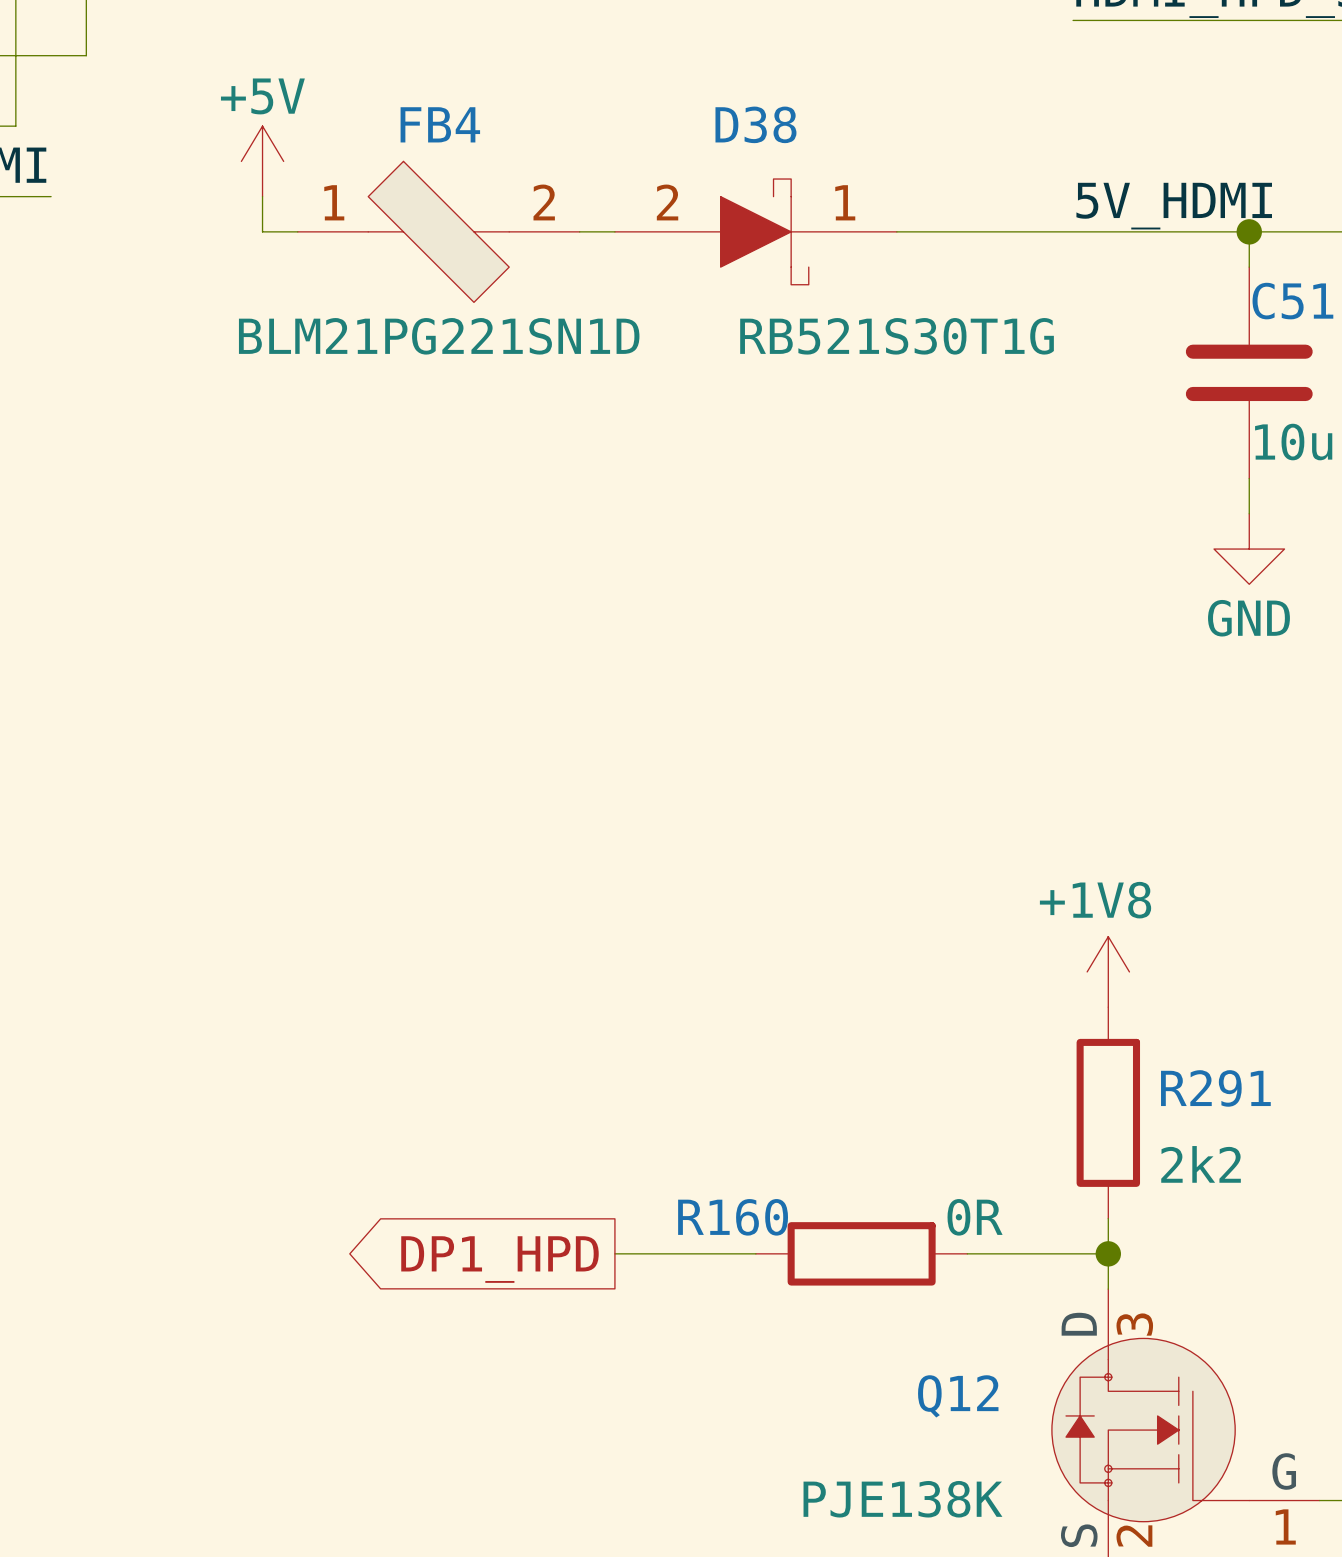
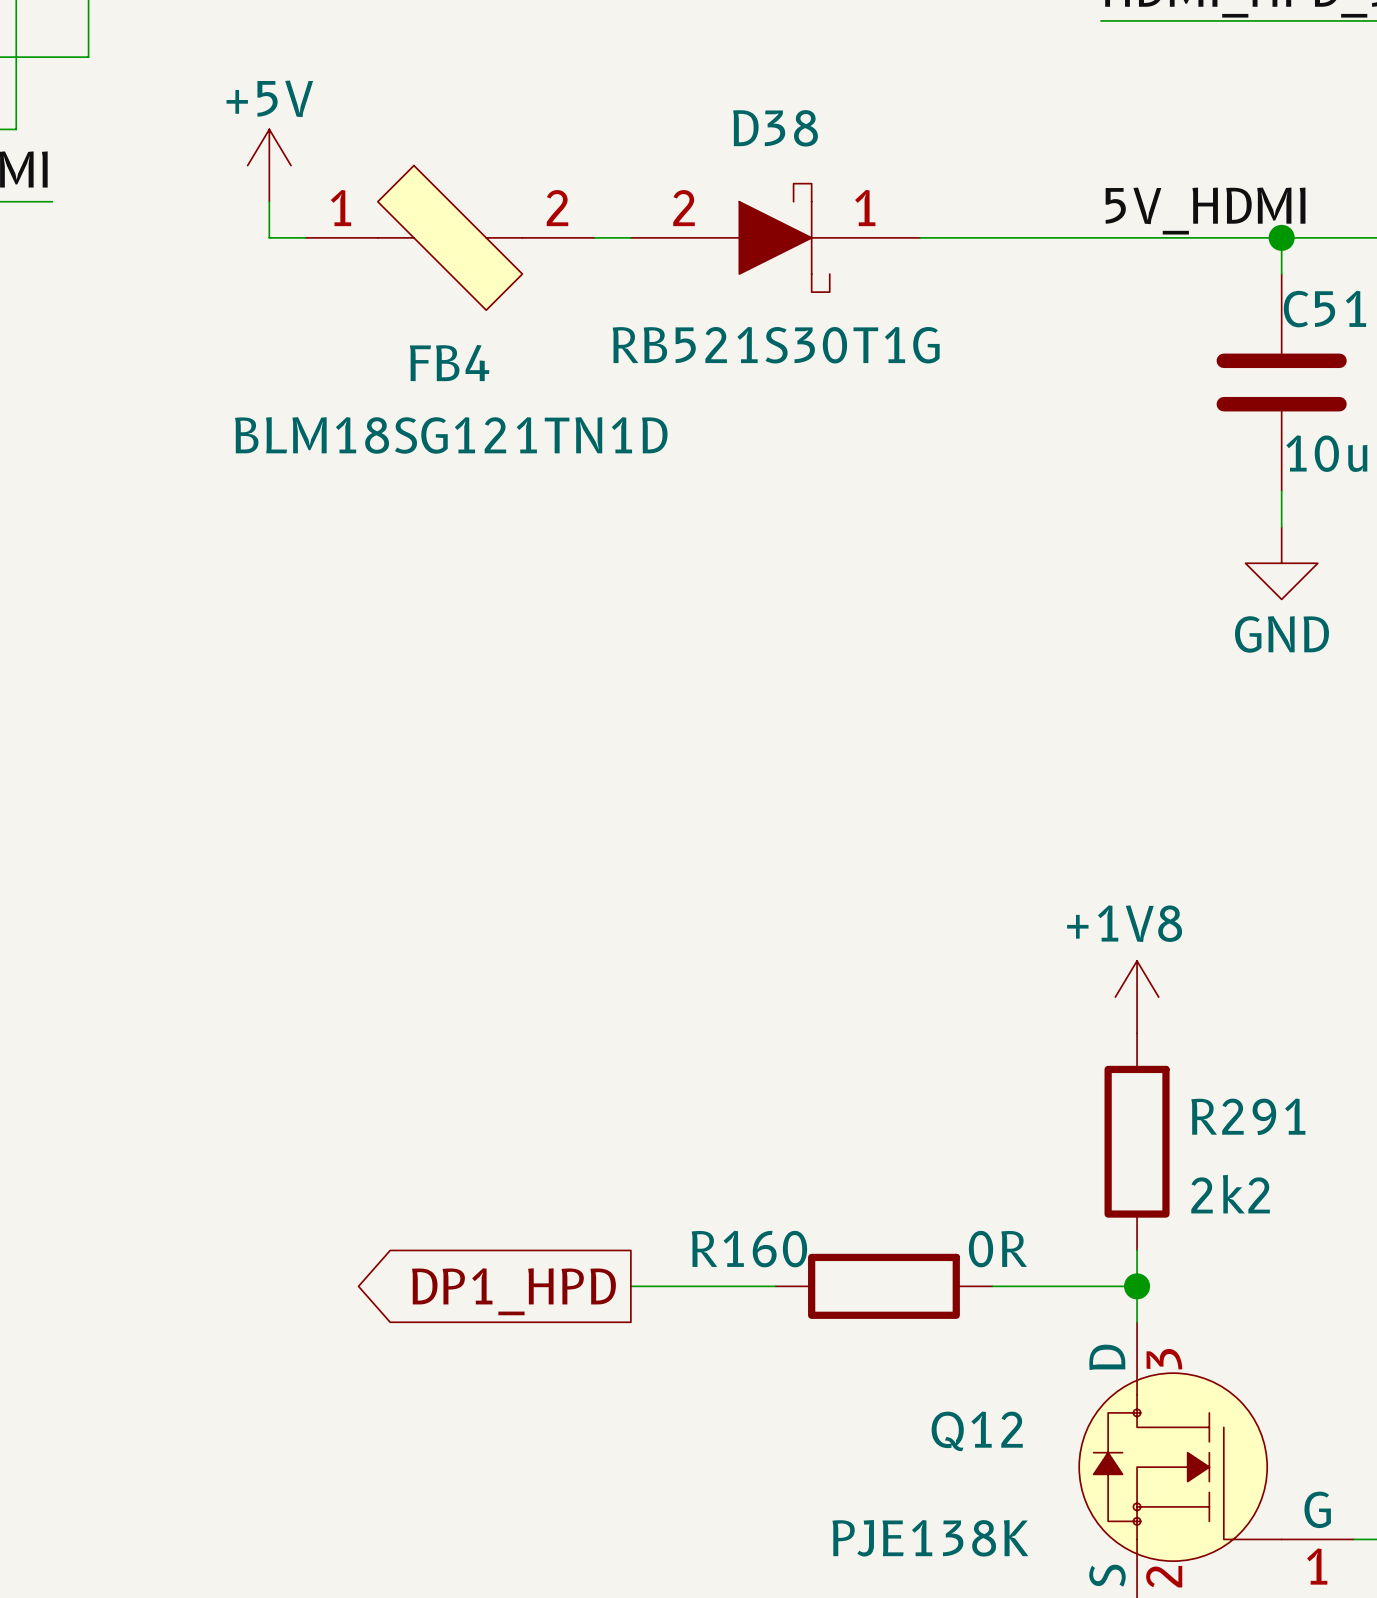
FB4 name position: FB4 (440, 124) -> FB4 (449, 363)
FB4 text: BLM21PG221SN1D (439, 336) -> none
D38 value position: RB521S30T1G (897, 336) -> RB521S30T1G (776, 345)
FB4 value: none -> BLM18SG121TN1D (451, 435)

